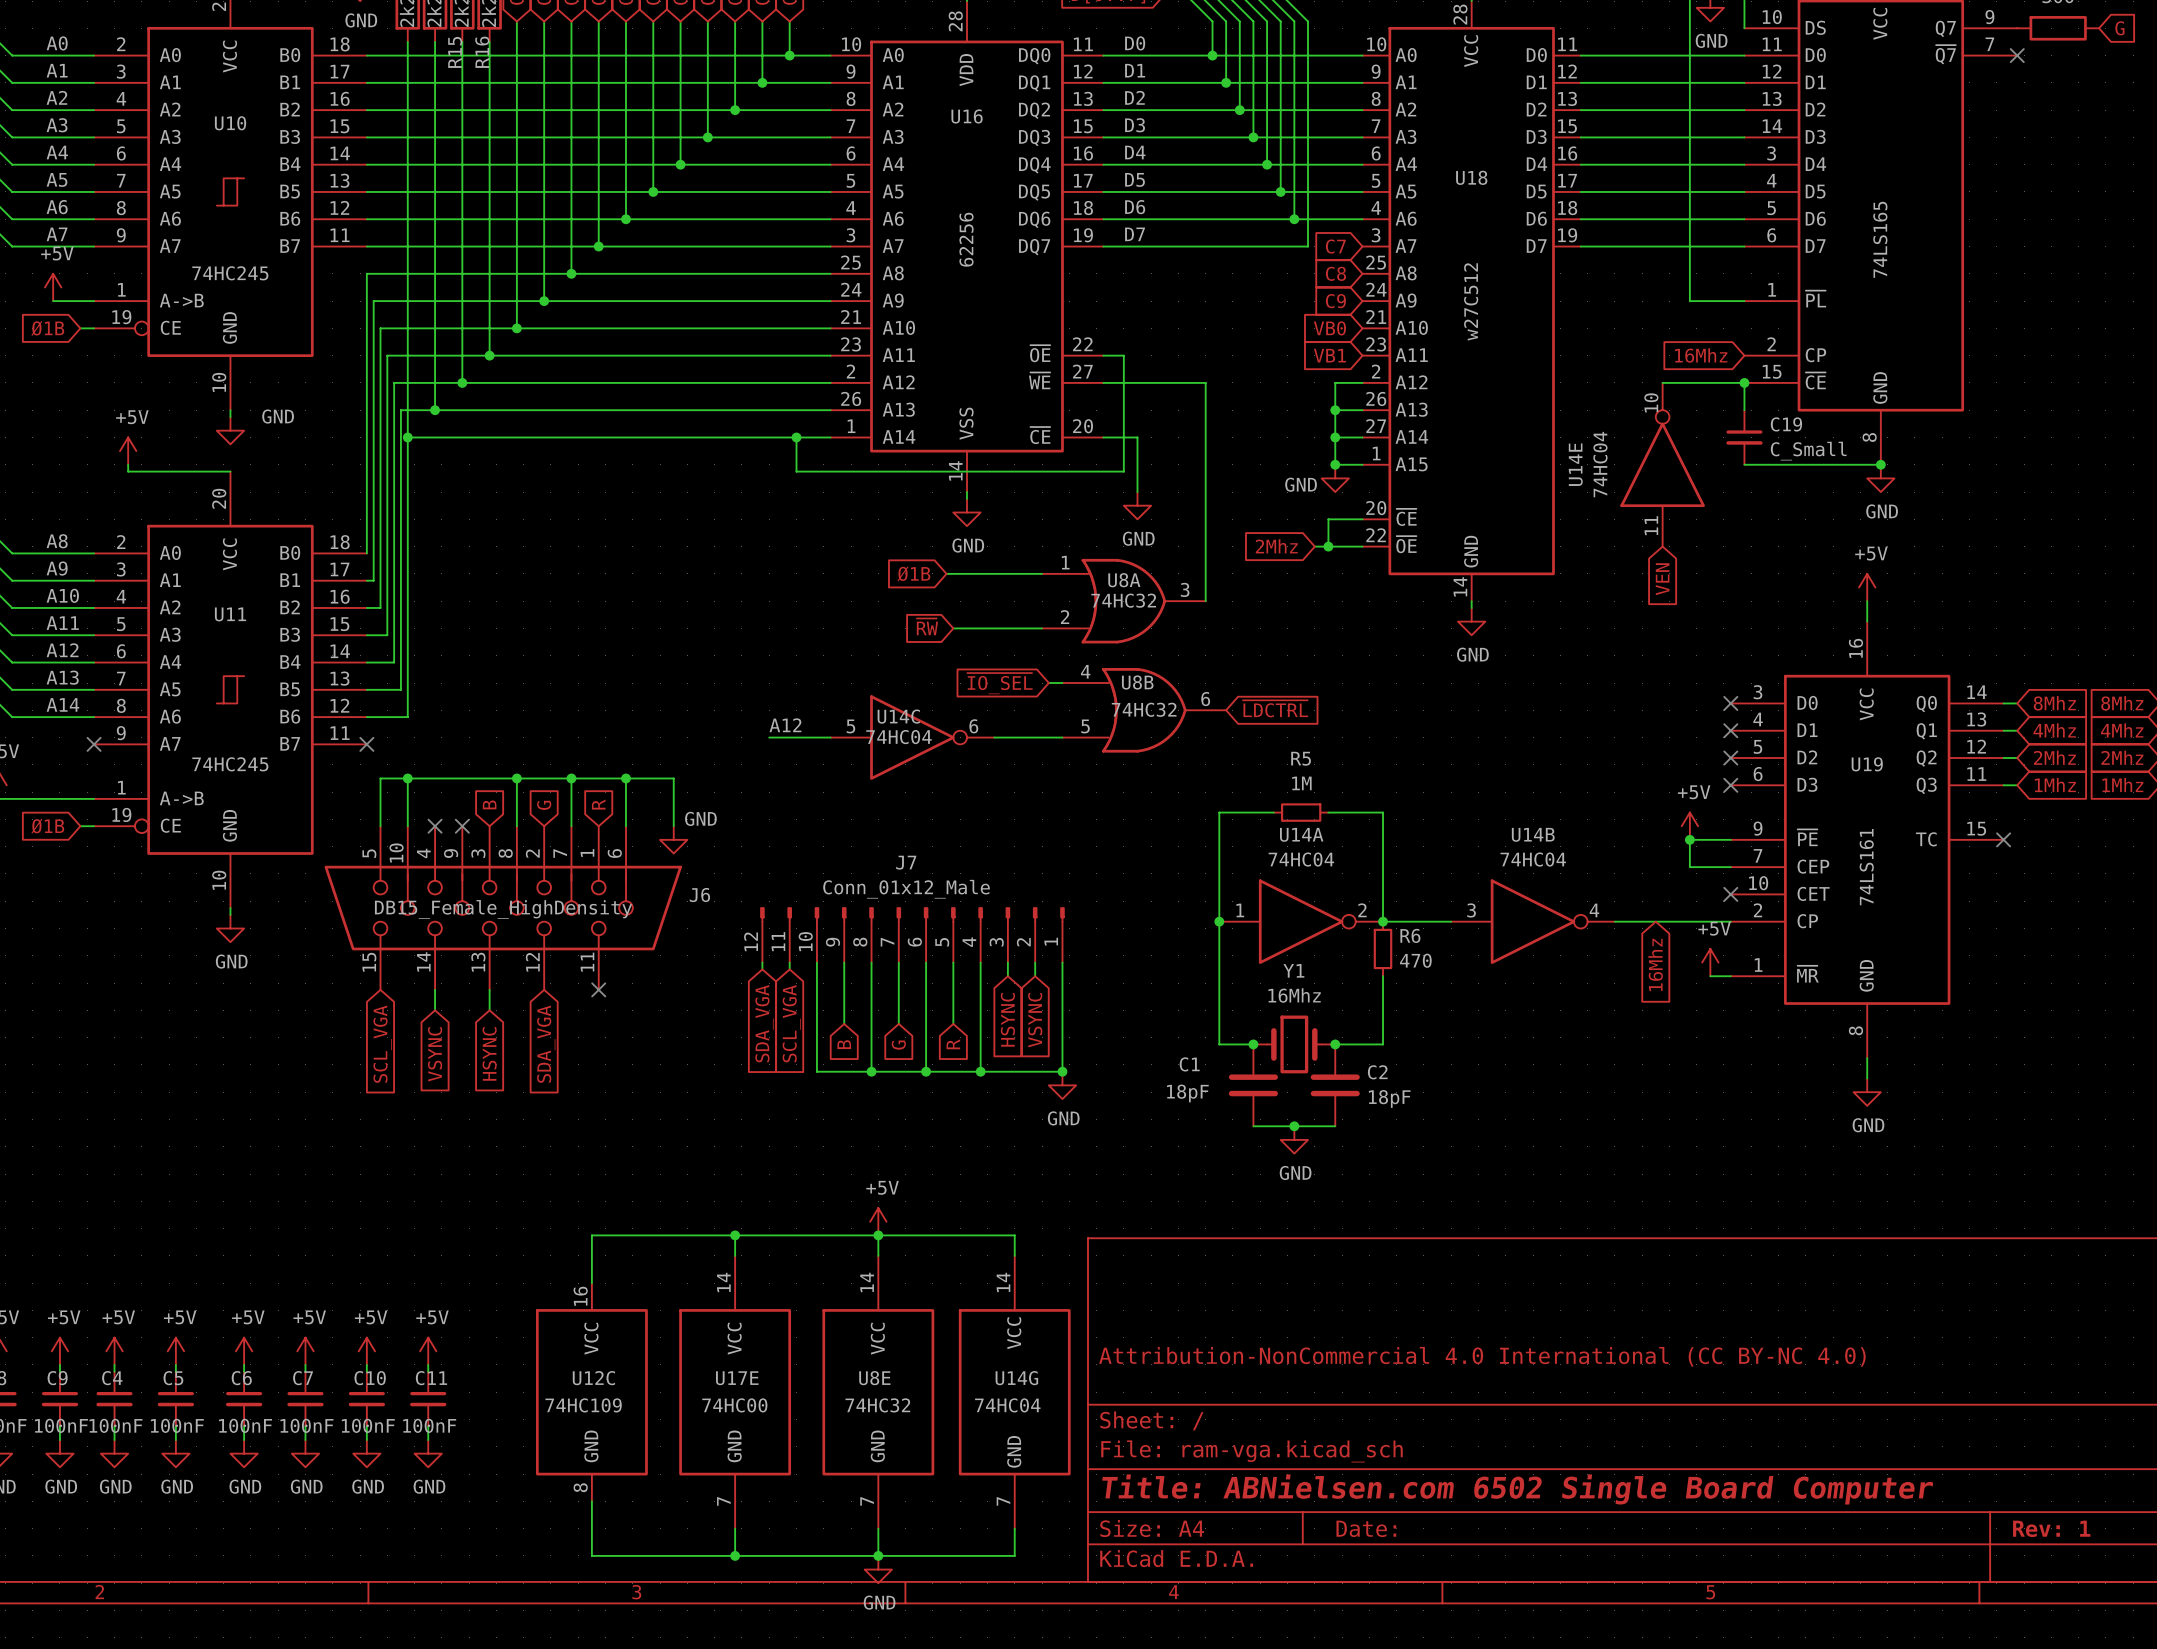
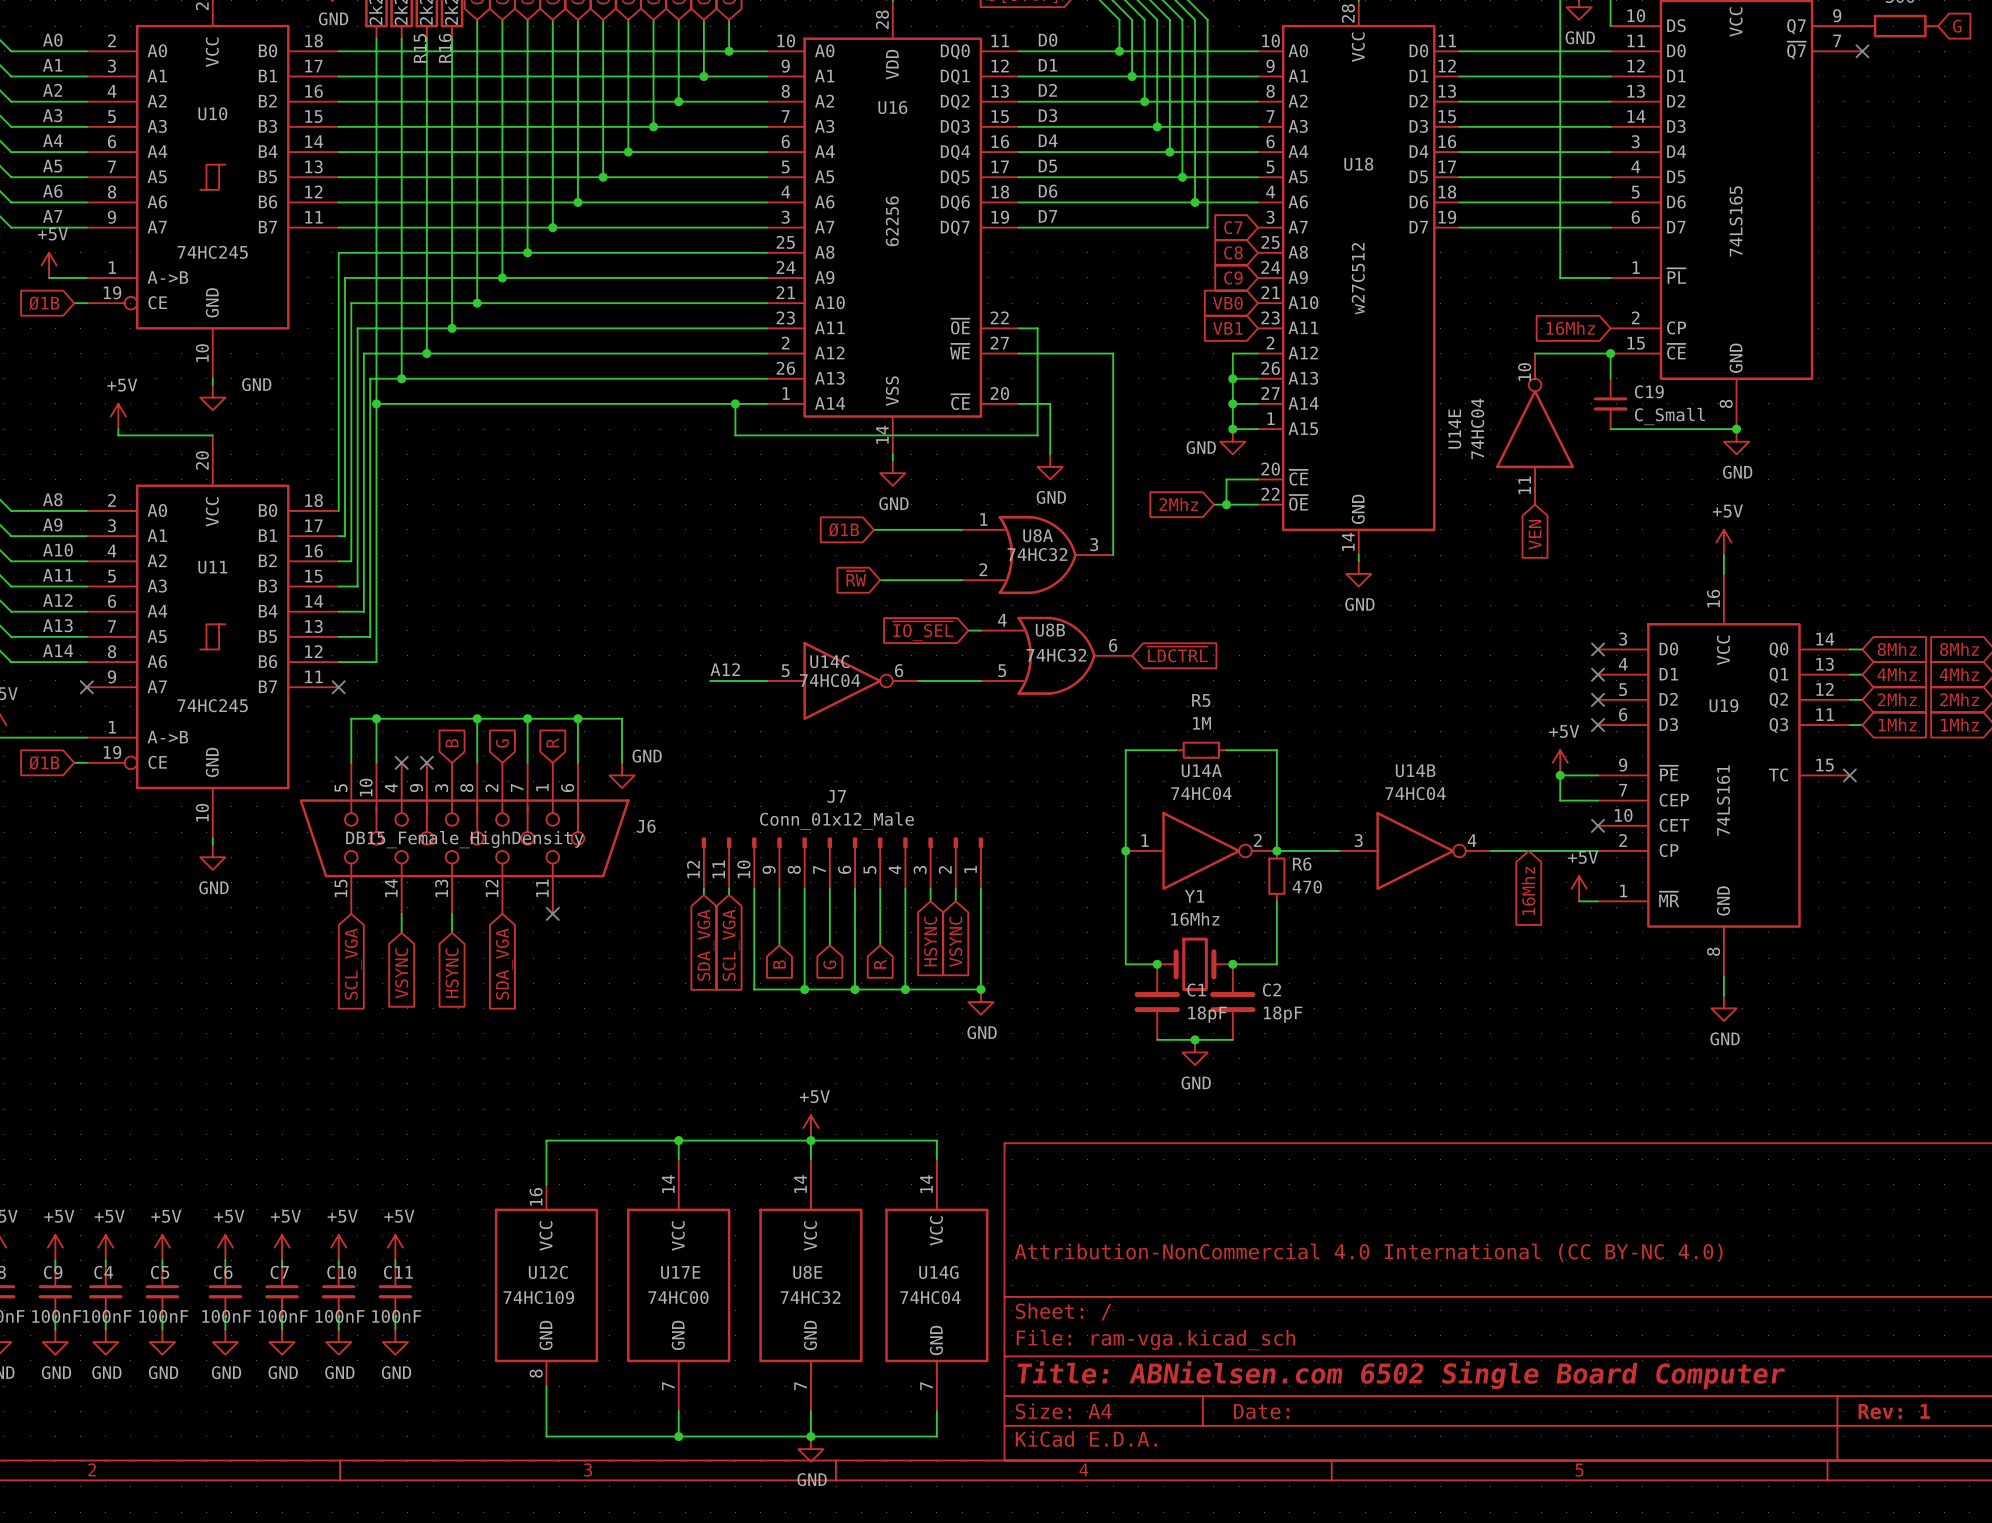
C1 name position: C1 (1189, 1064) -> C1 (1196, 990)
C1 value position: 18pF (1187, 1093) -> 18pF (1207, 1014)

